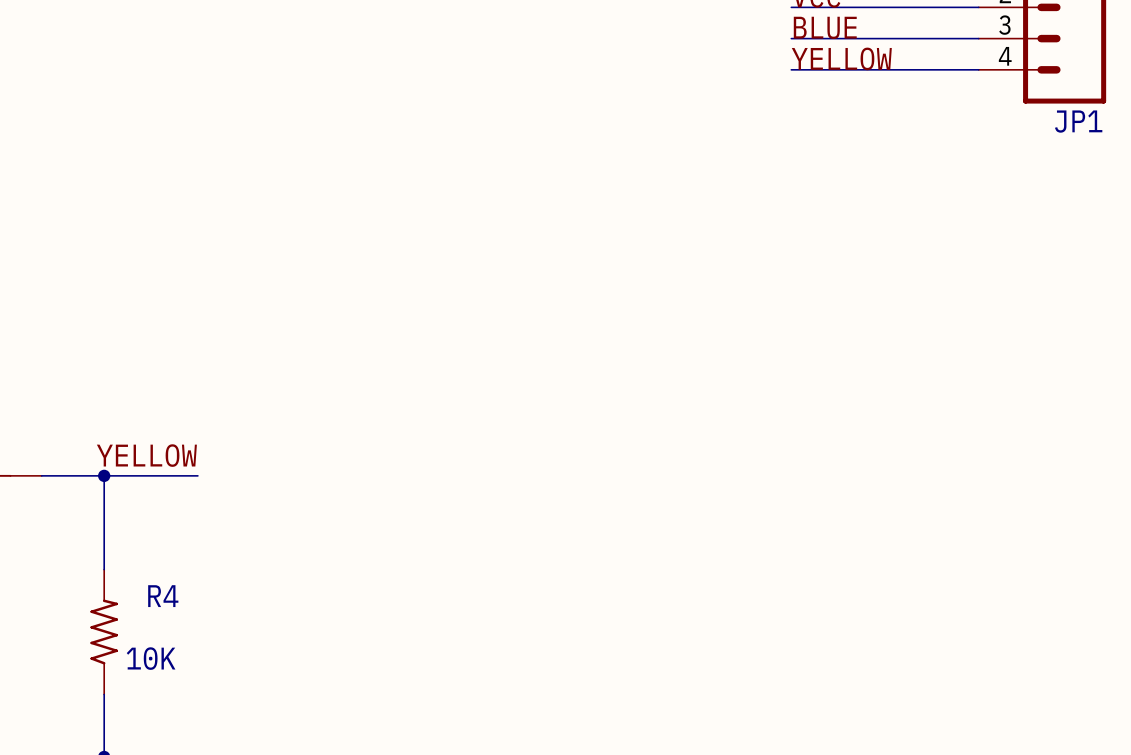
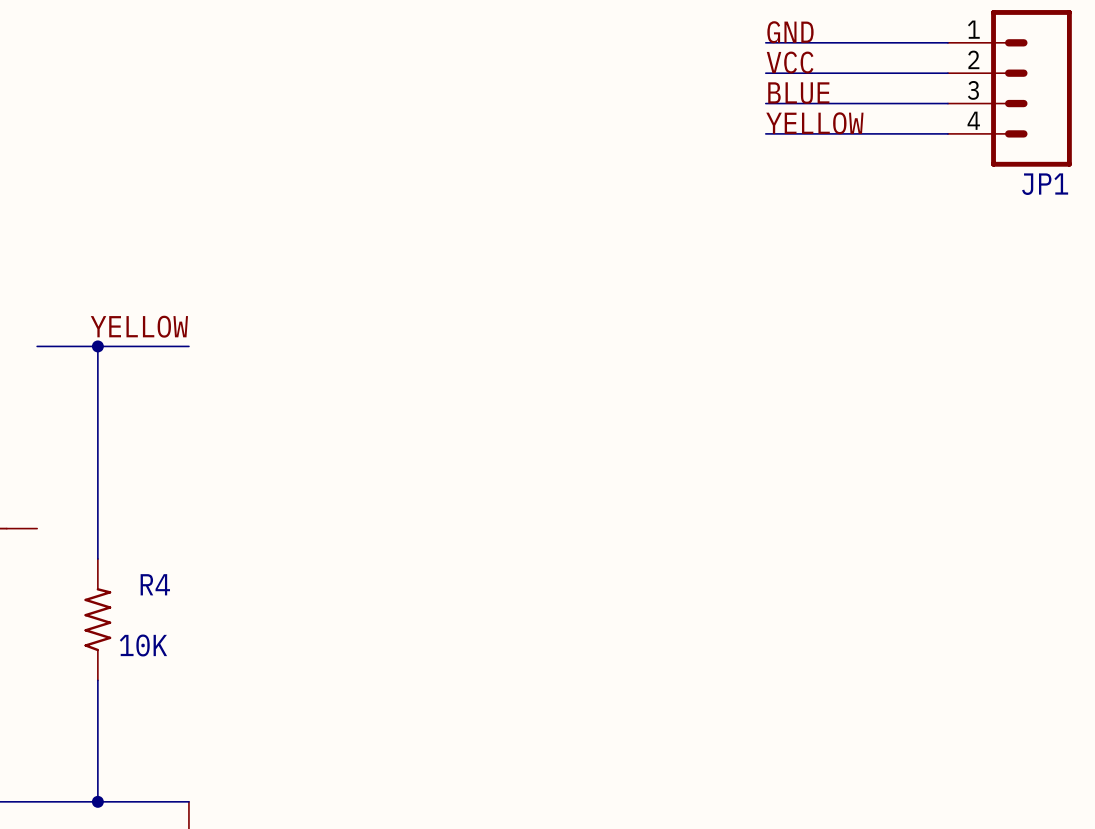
wire: none -> (97, 346) (97, 528)
junction: none -> (97, 346)
label position: YELLOW (146, 455) -> YELLOW (139, 326)
wire: (41, 475) (197, 475) -> (37, 346) (188, 346)
junction: (104, 475) -> none
R4 position: (104, 632) -> (97, 619)

